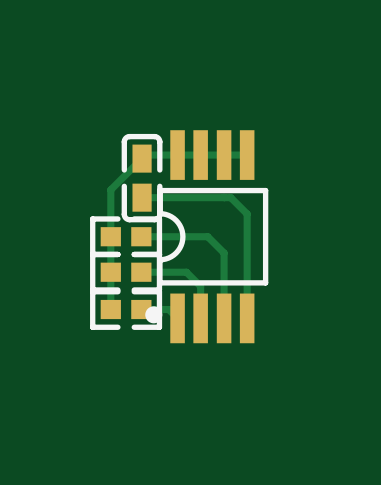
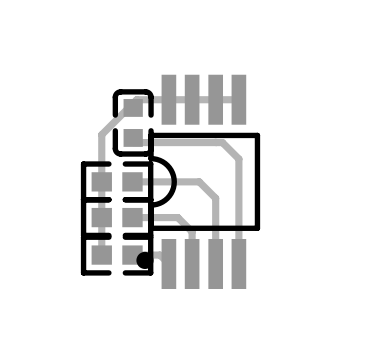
part footprint: [121, 133, 163, 223] -> [112, 89, 154, 157]

